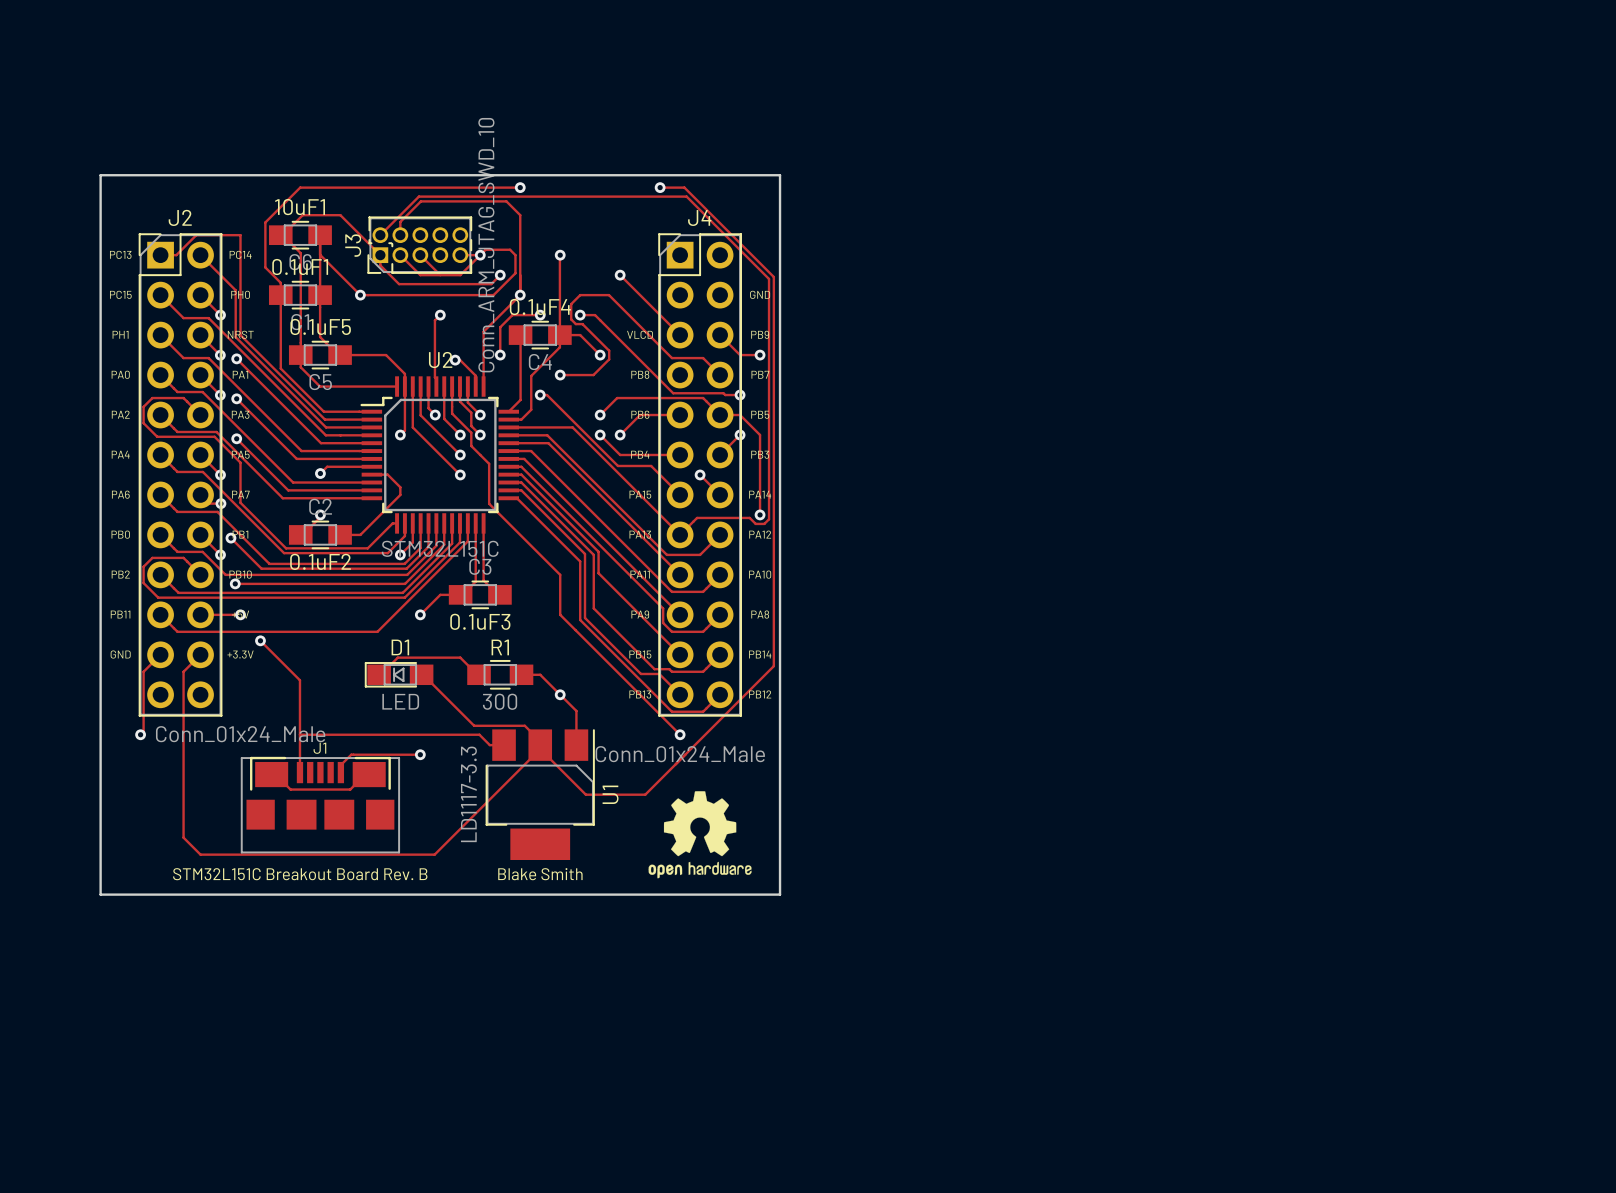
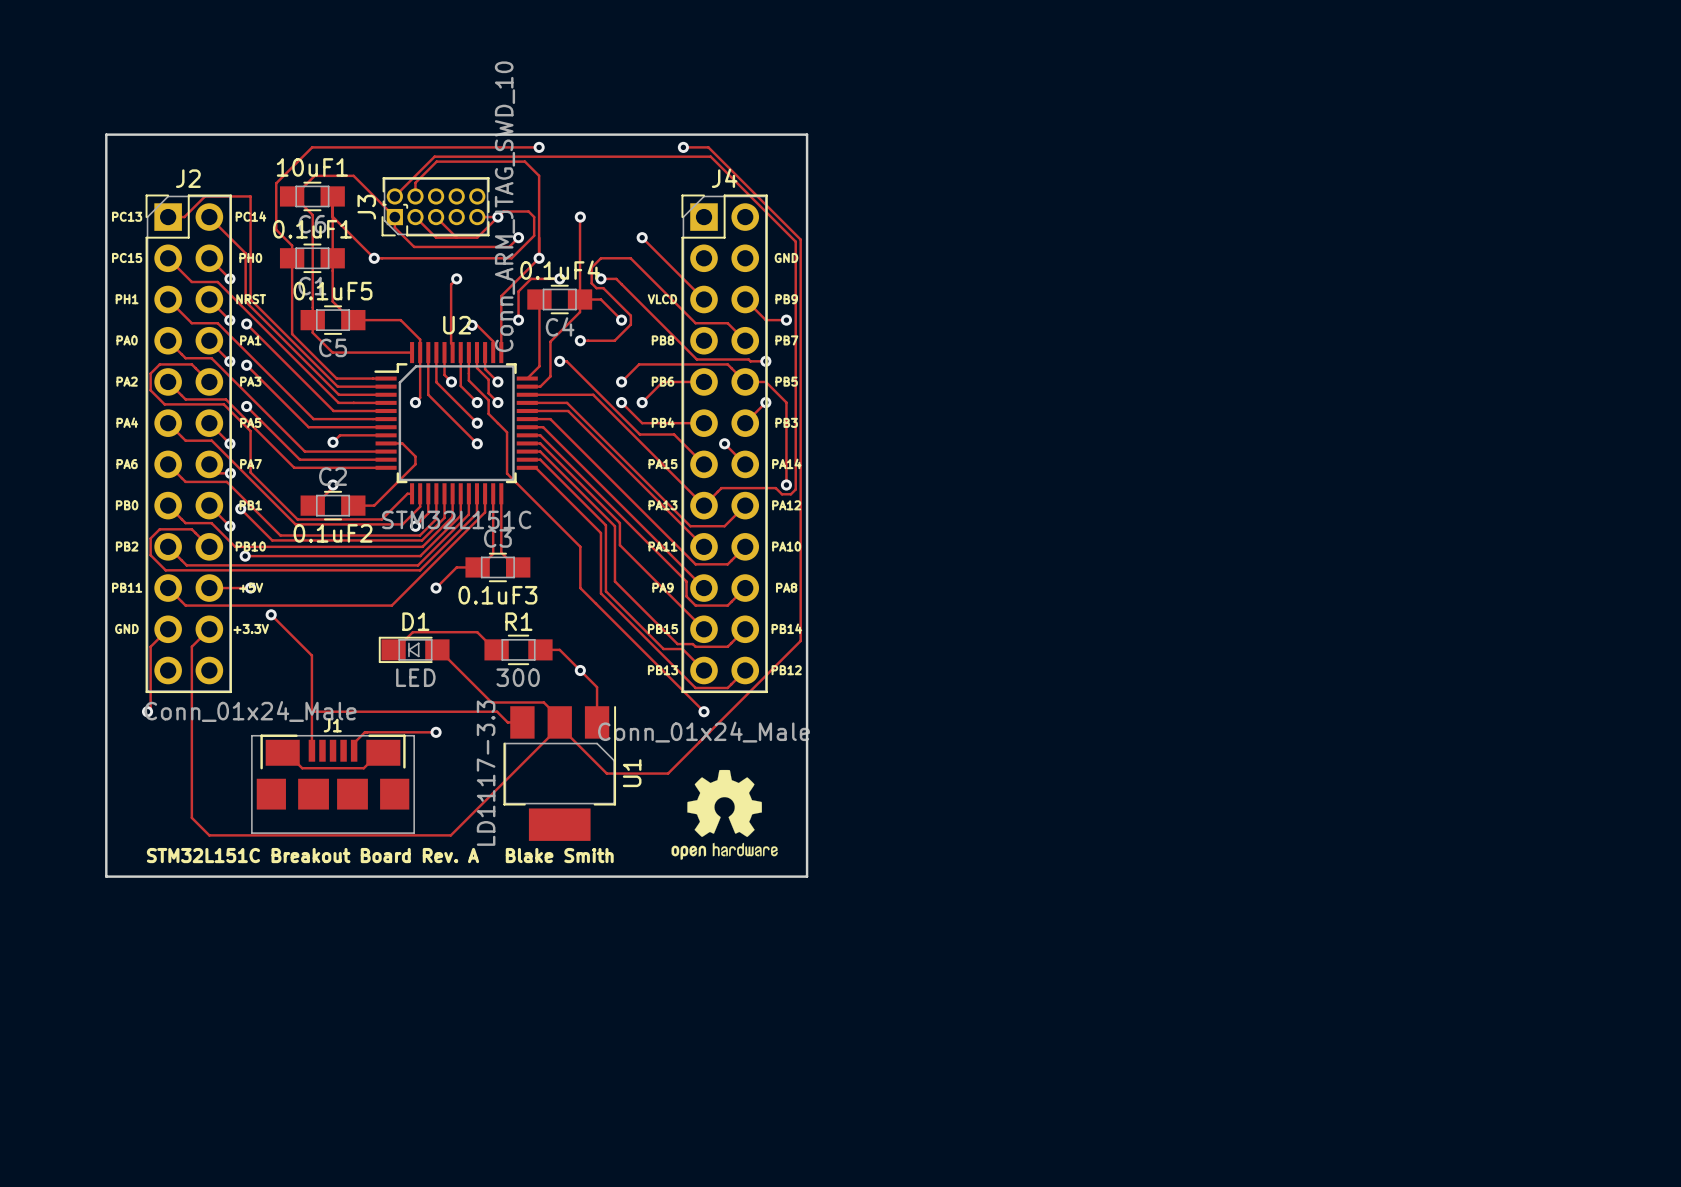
text: STM32L151C Breakout Board Rev. B (300, 874) -> STM32L151C Breakout Board Rev. A (312, 855)

